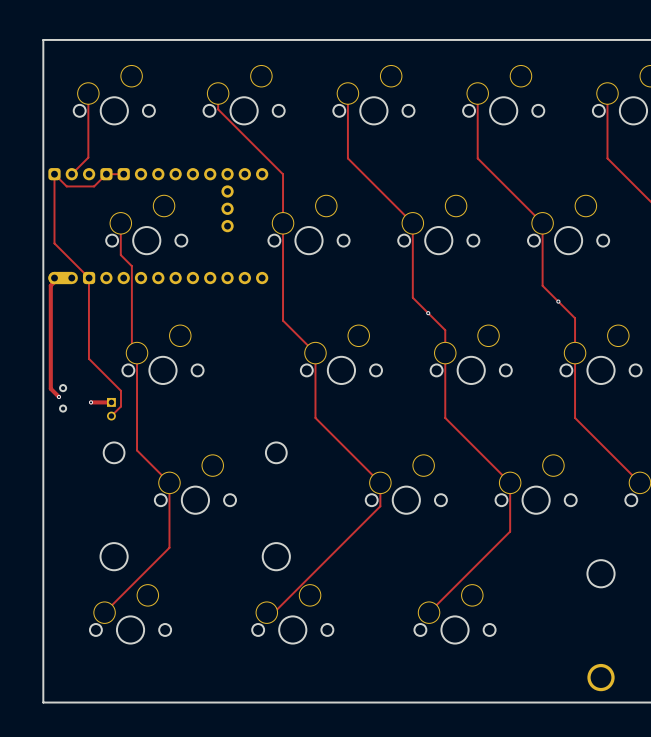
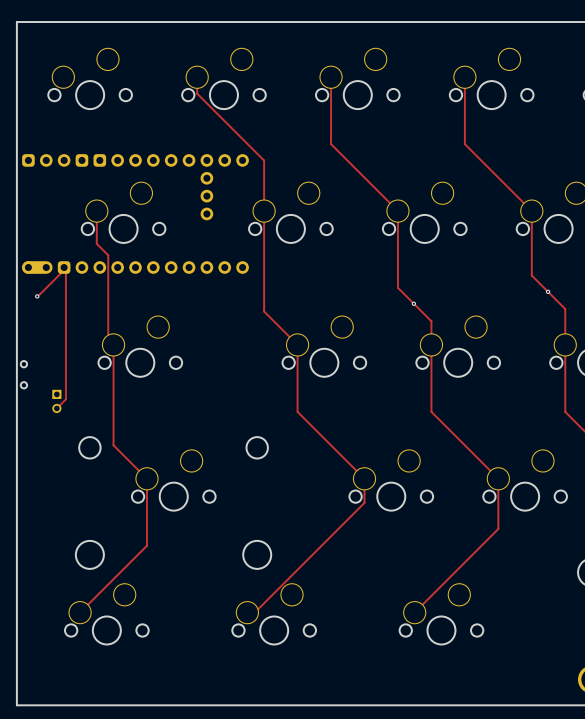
track: (88, 93) (88, 157) (71, 174) -> none
track: (123, 174) (106, 174) (94, 186) (66, 186) (54, 174) (54, 243) (89, 278) (88, 358) (120, 390) (120, 406) (111, 416) -> none
track: (54, 281) (50, 285) (50, 388) (58, 396) -> none
track: none -> (35, 296) (65, 268) (65, 399) (56, 408)
via: none -> (37, 296)
via: (58, 396) -> none
part position: (63, 398) -> (23, 374)
track: (91, 402) (110, 402) (112, 404) -> none
via: (91, 402) -> none
part position: (111, 409) -> (56, 401)

